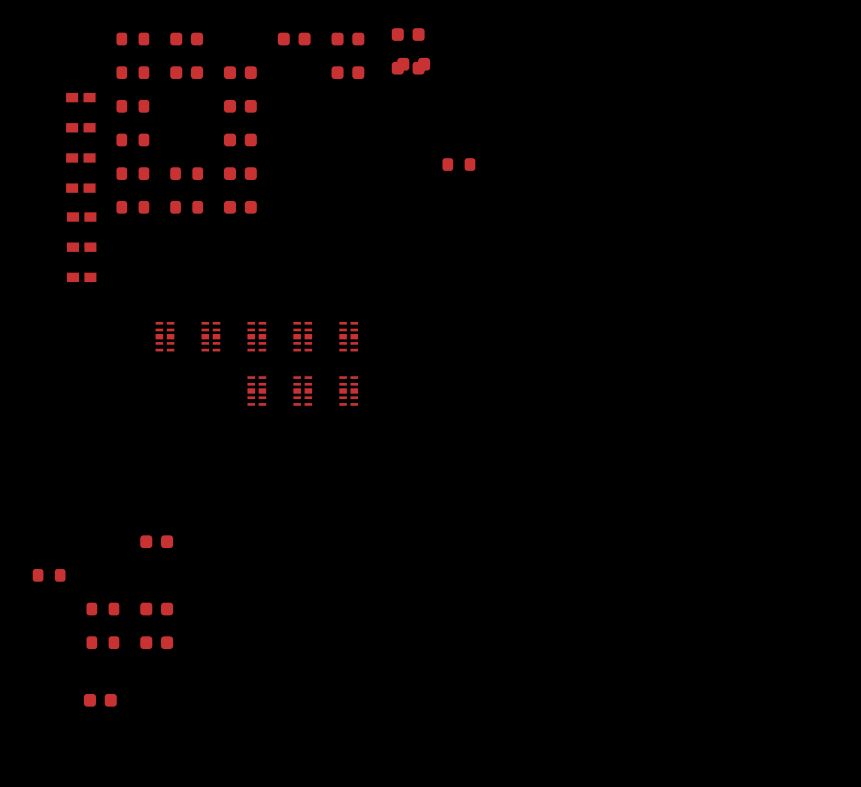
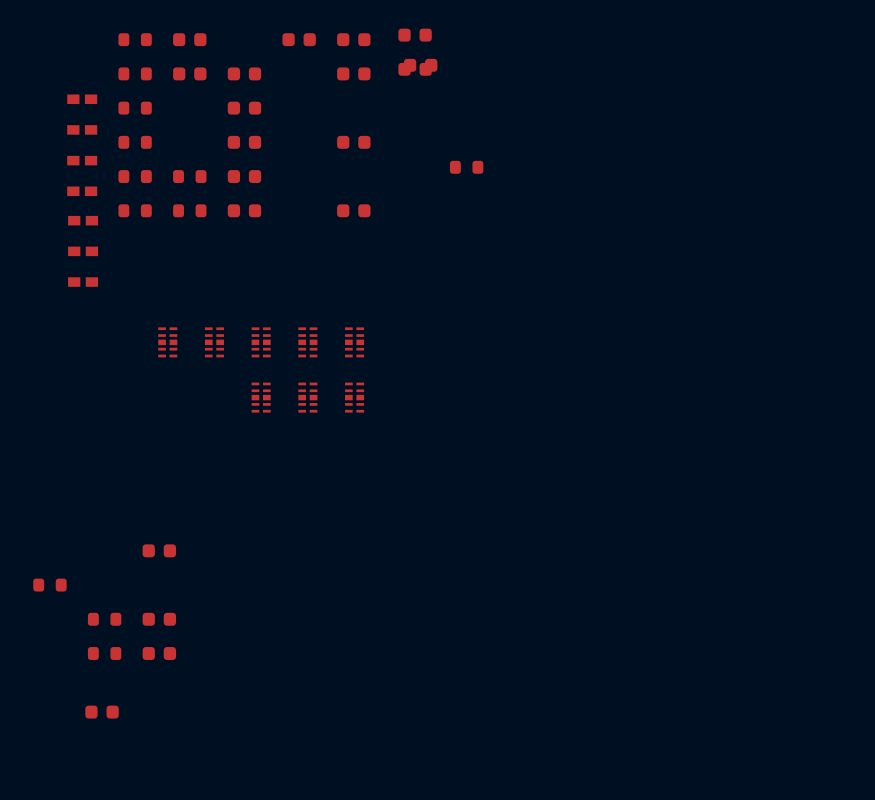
part: none -> (353, 142)
part: none -> (353, 210)

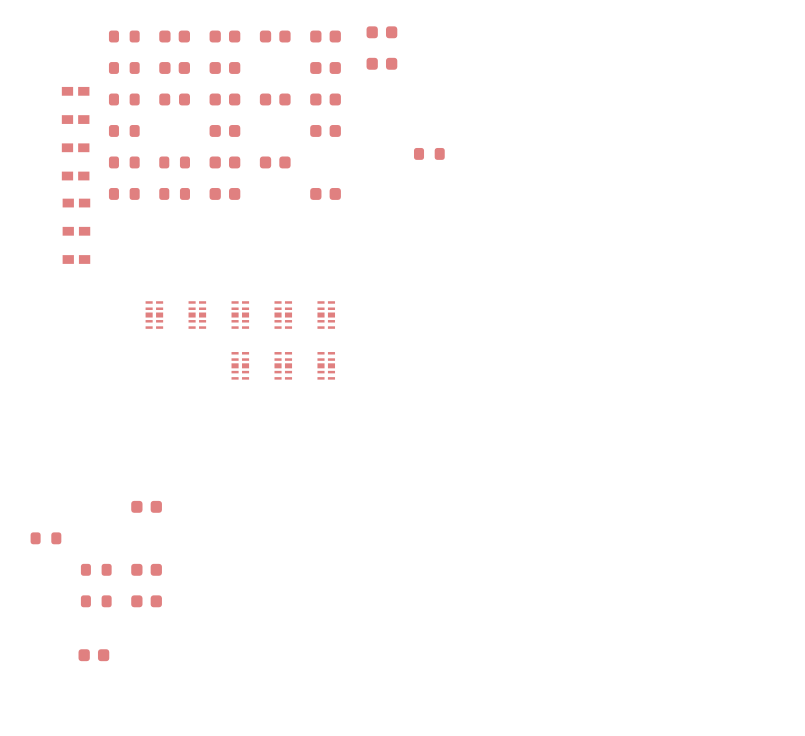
part: none -> (224, 36)
part: (420, 65) -> none
part: none -> (174, 99)
part: none -> (275, 99)
part: none -> (325, 99)
part: none -> (275, 162)

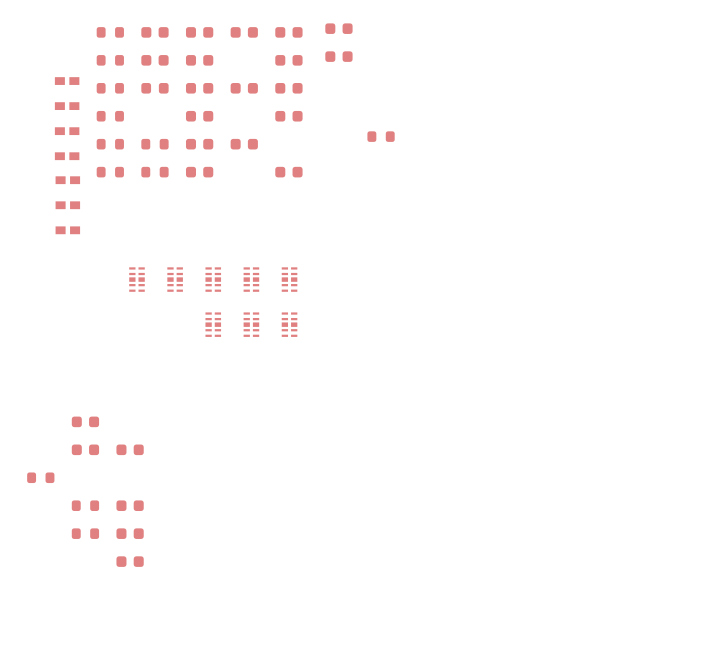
part: none -> (85, 421)
part: none -> (85, 449)
part position: (93, 655) -> (130, 561)

